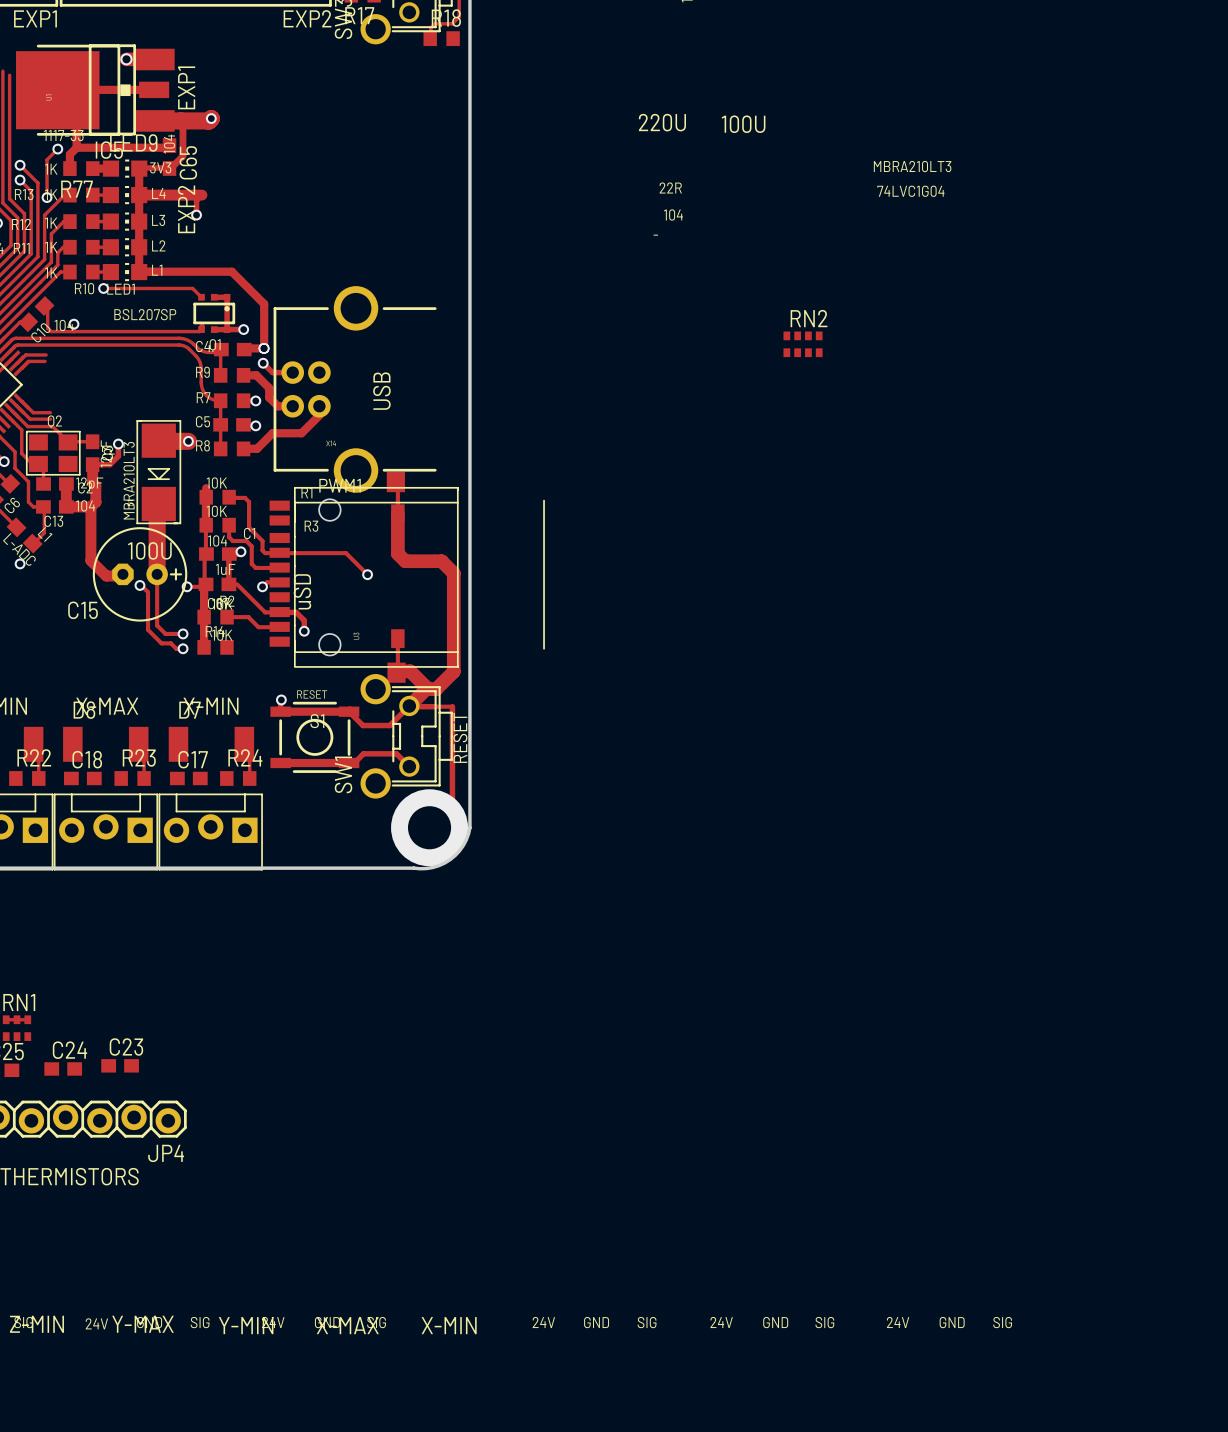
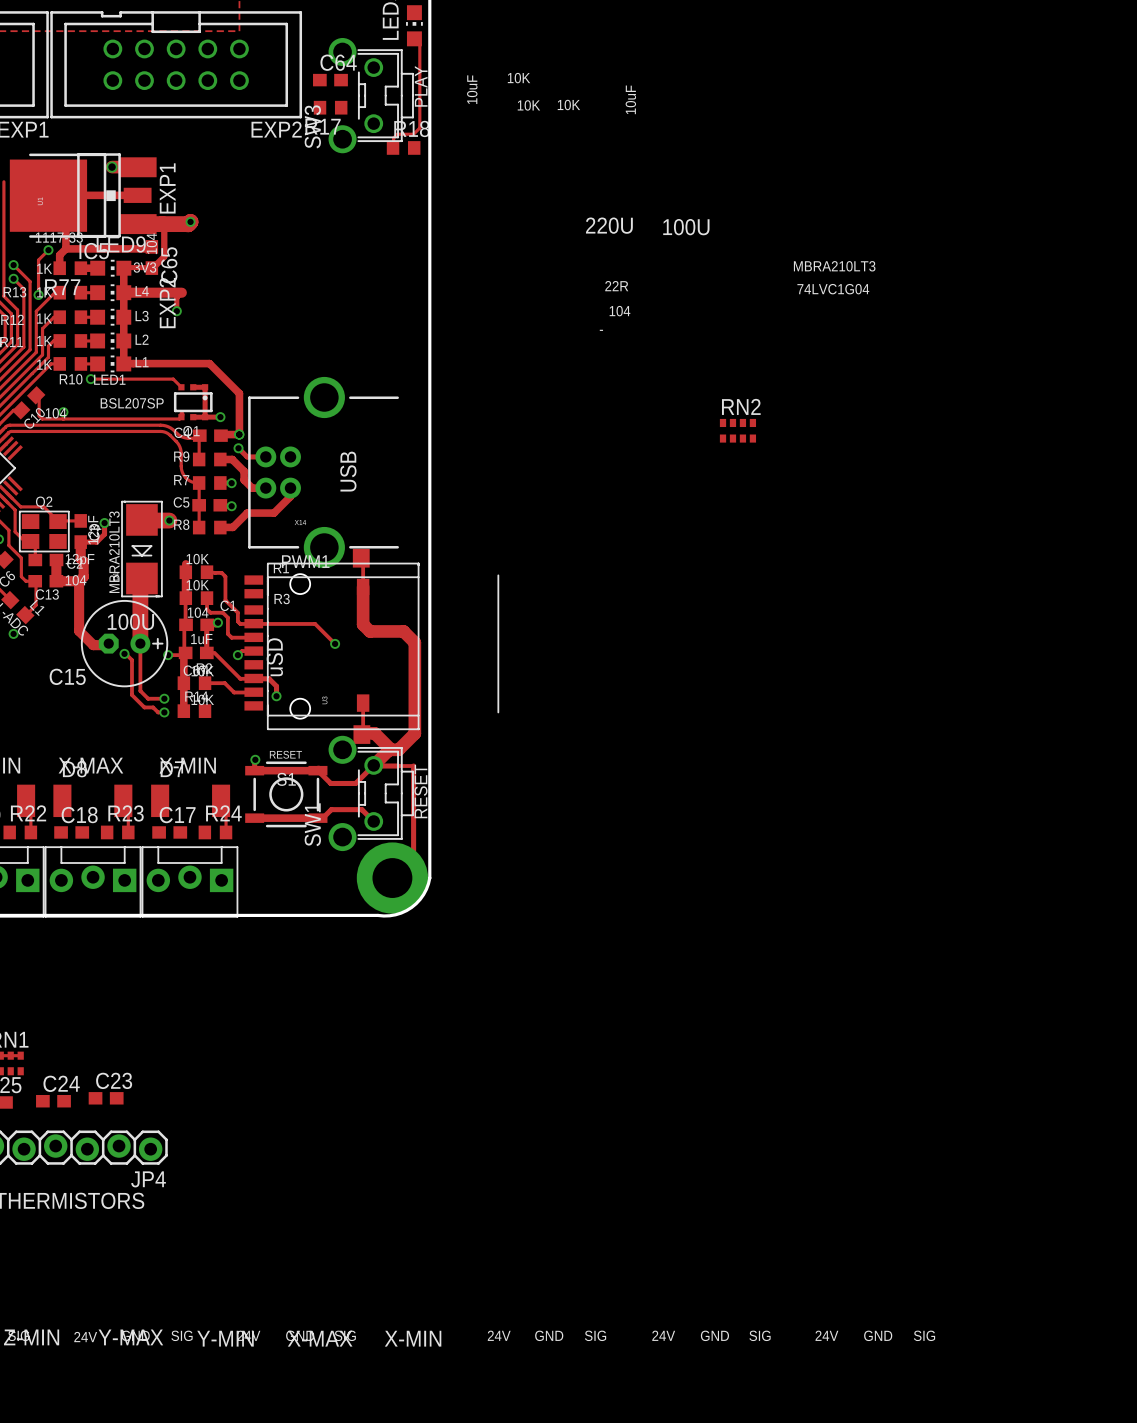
track: (46, 354) (25, 354) (16, 363) -> none
track: (45, 361) (29, 361) (21, 368) -> none
track: (22, 401) (33, 412) (50, 412) -> none
track: (17, 406) (30, 419) (50, 419) -> none

